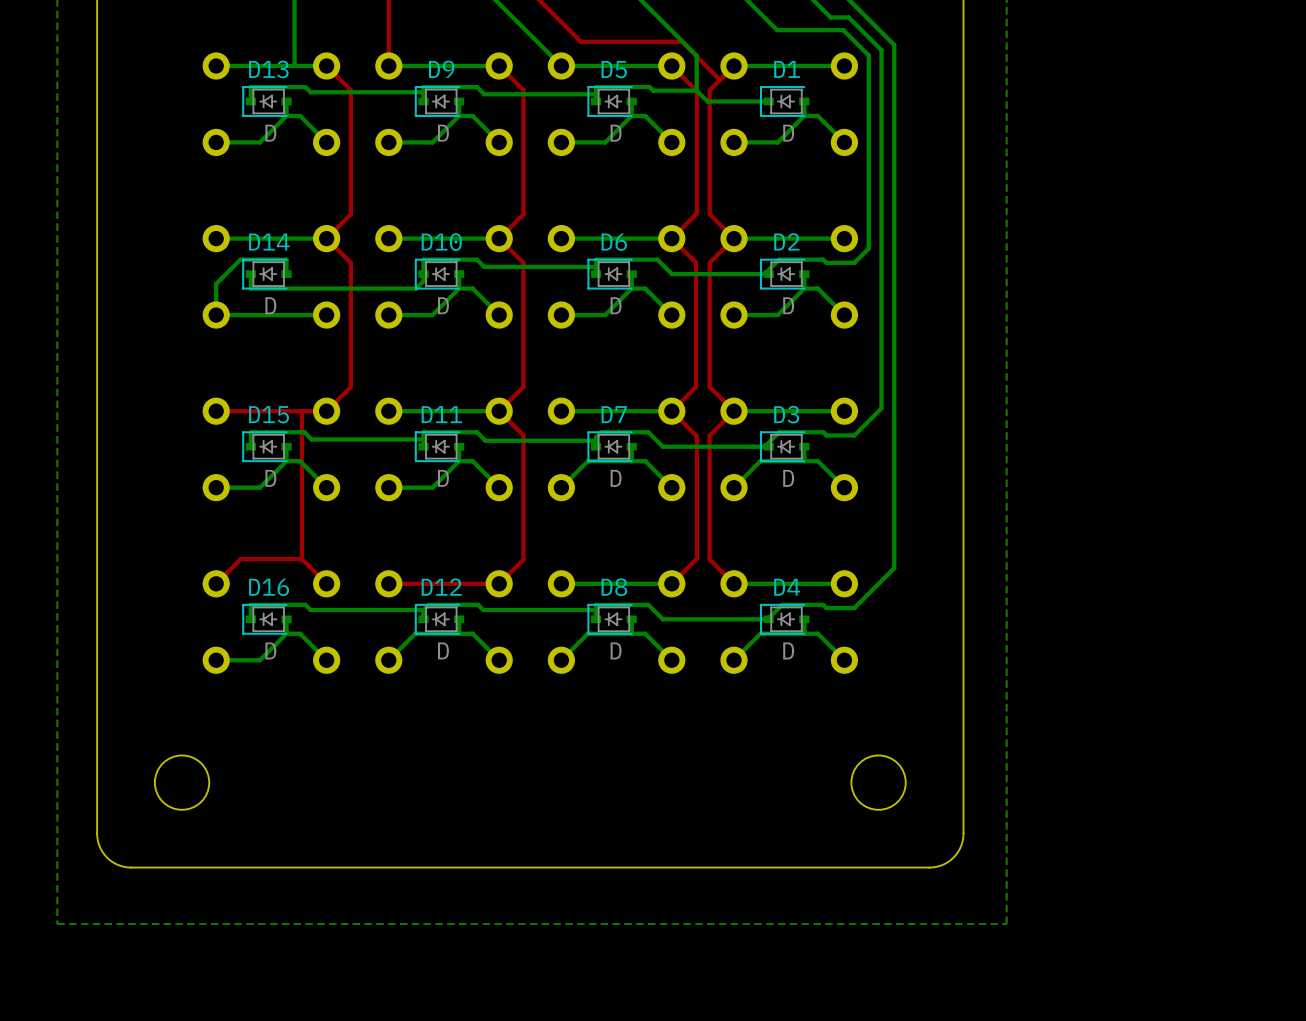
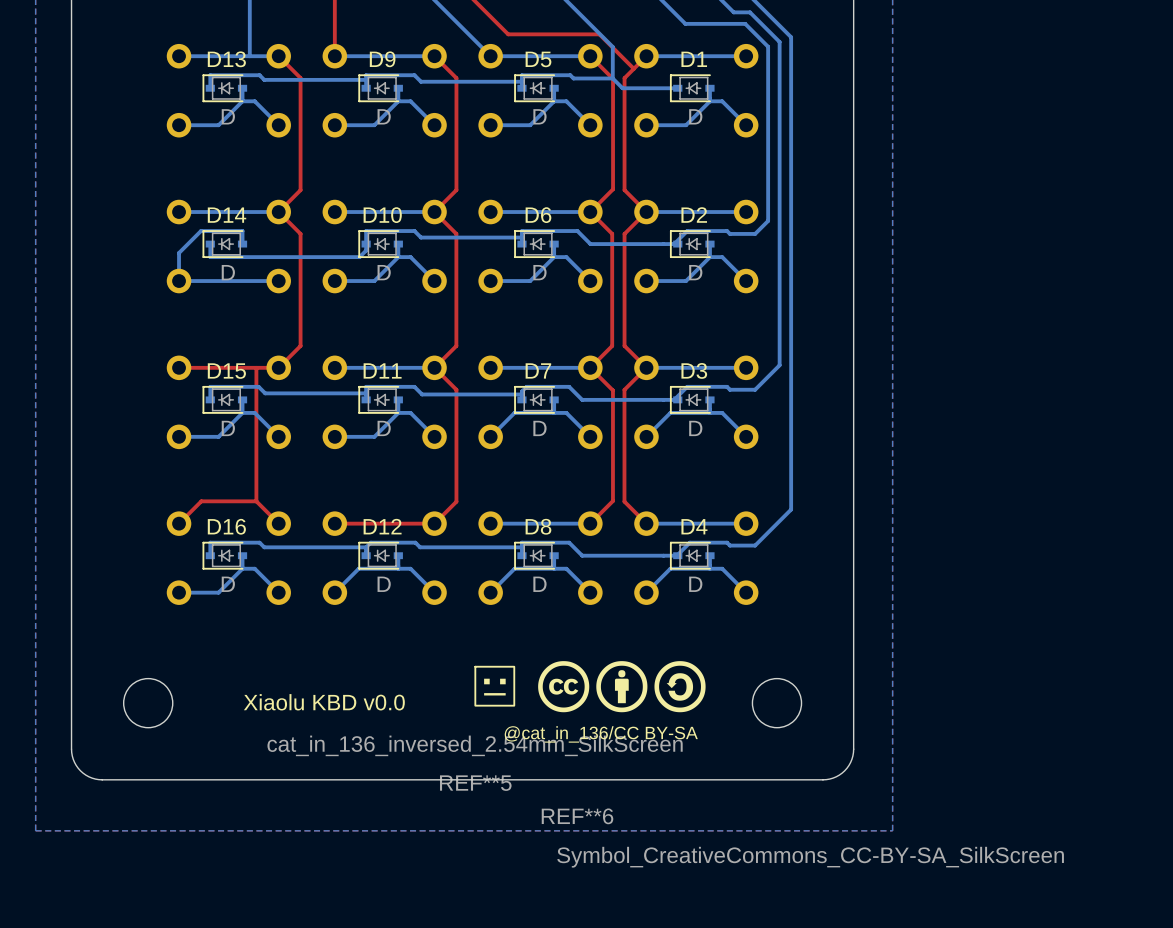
REF**5: none -> cat_in_136_inversed_2.54mm_SilkScreen (494, 686)
REF**6: none -> Symbol_CreativeCommons_CC-BY-SA_SilkScreen (621, 686)
text: none -> Xiaolu KBD v0.0 (324, 702)
text: none -> @cat_in_136/CC BY-SA (601, 734)

